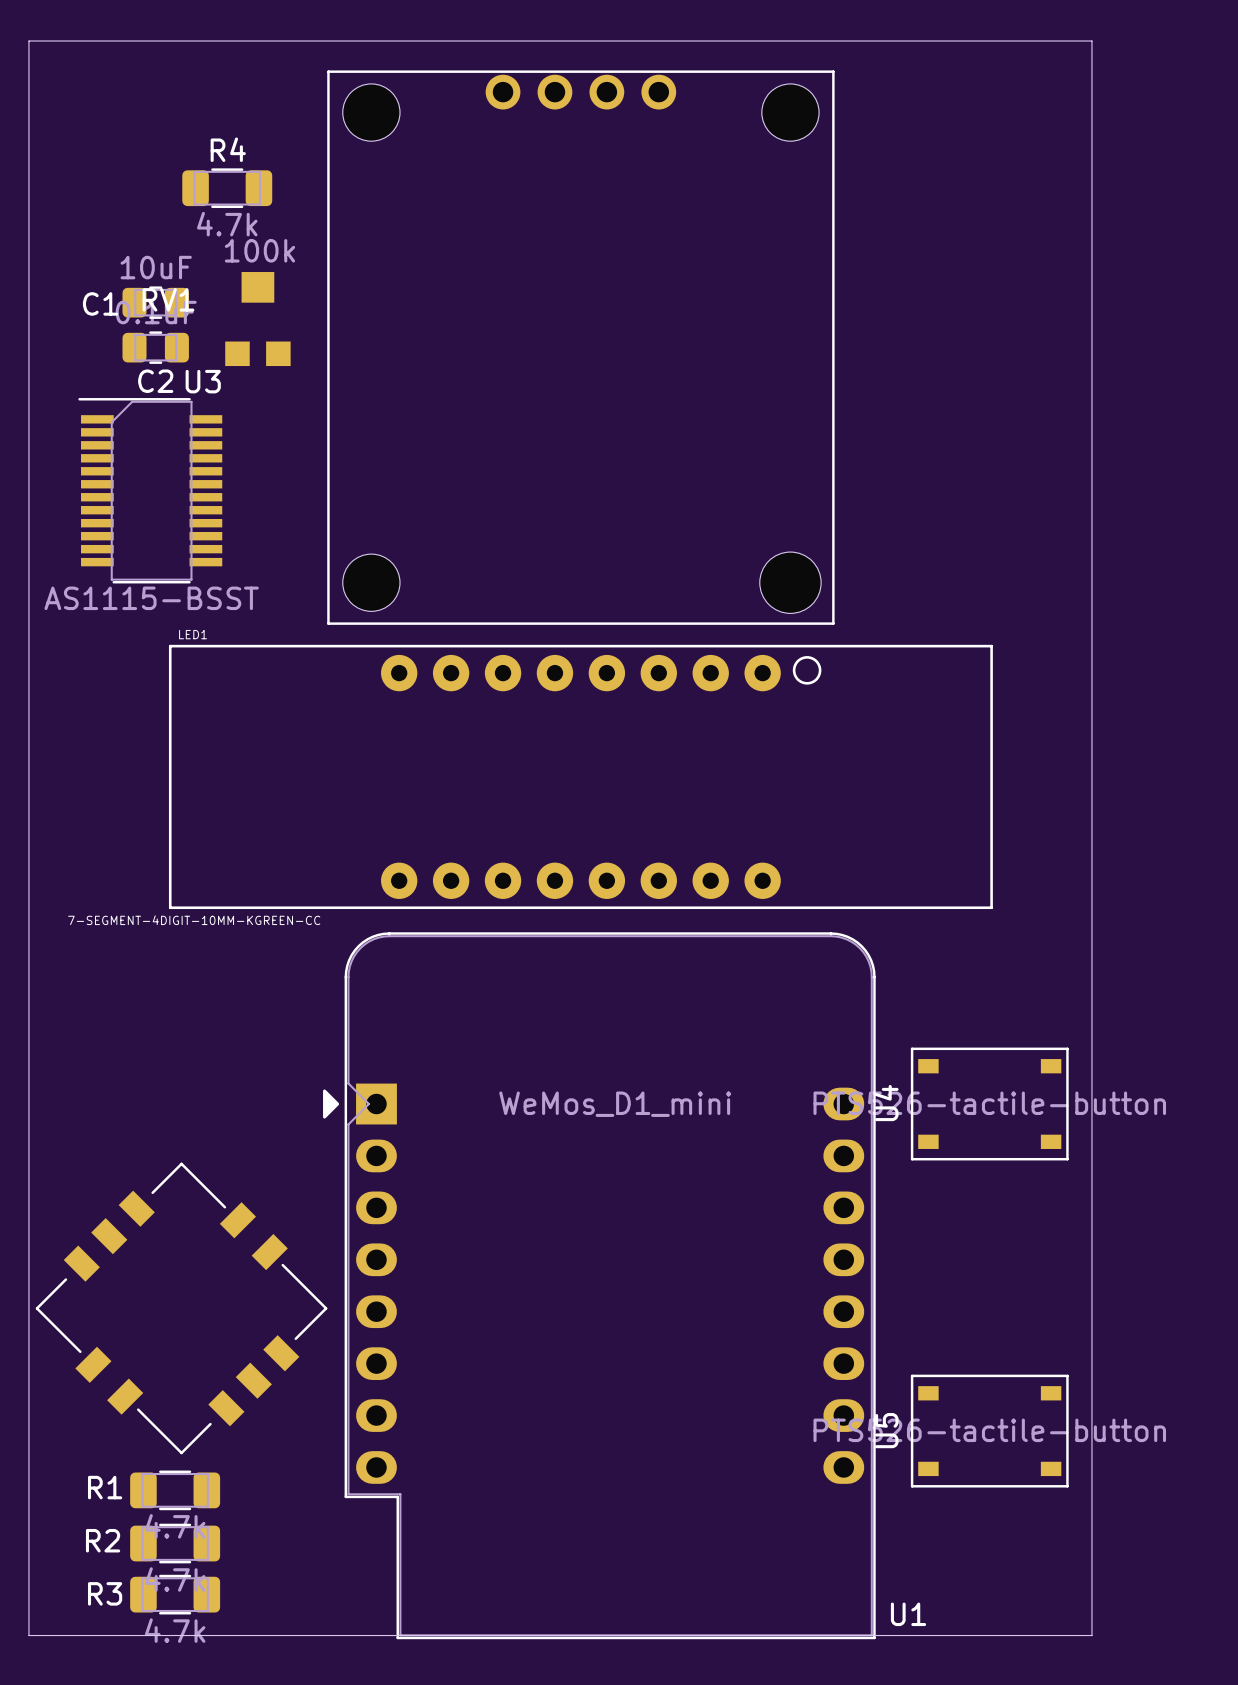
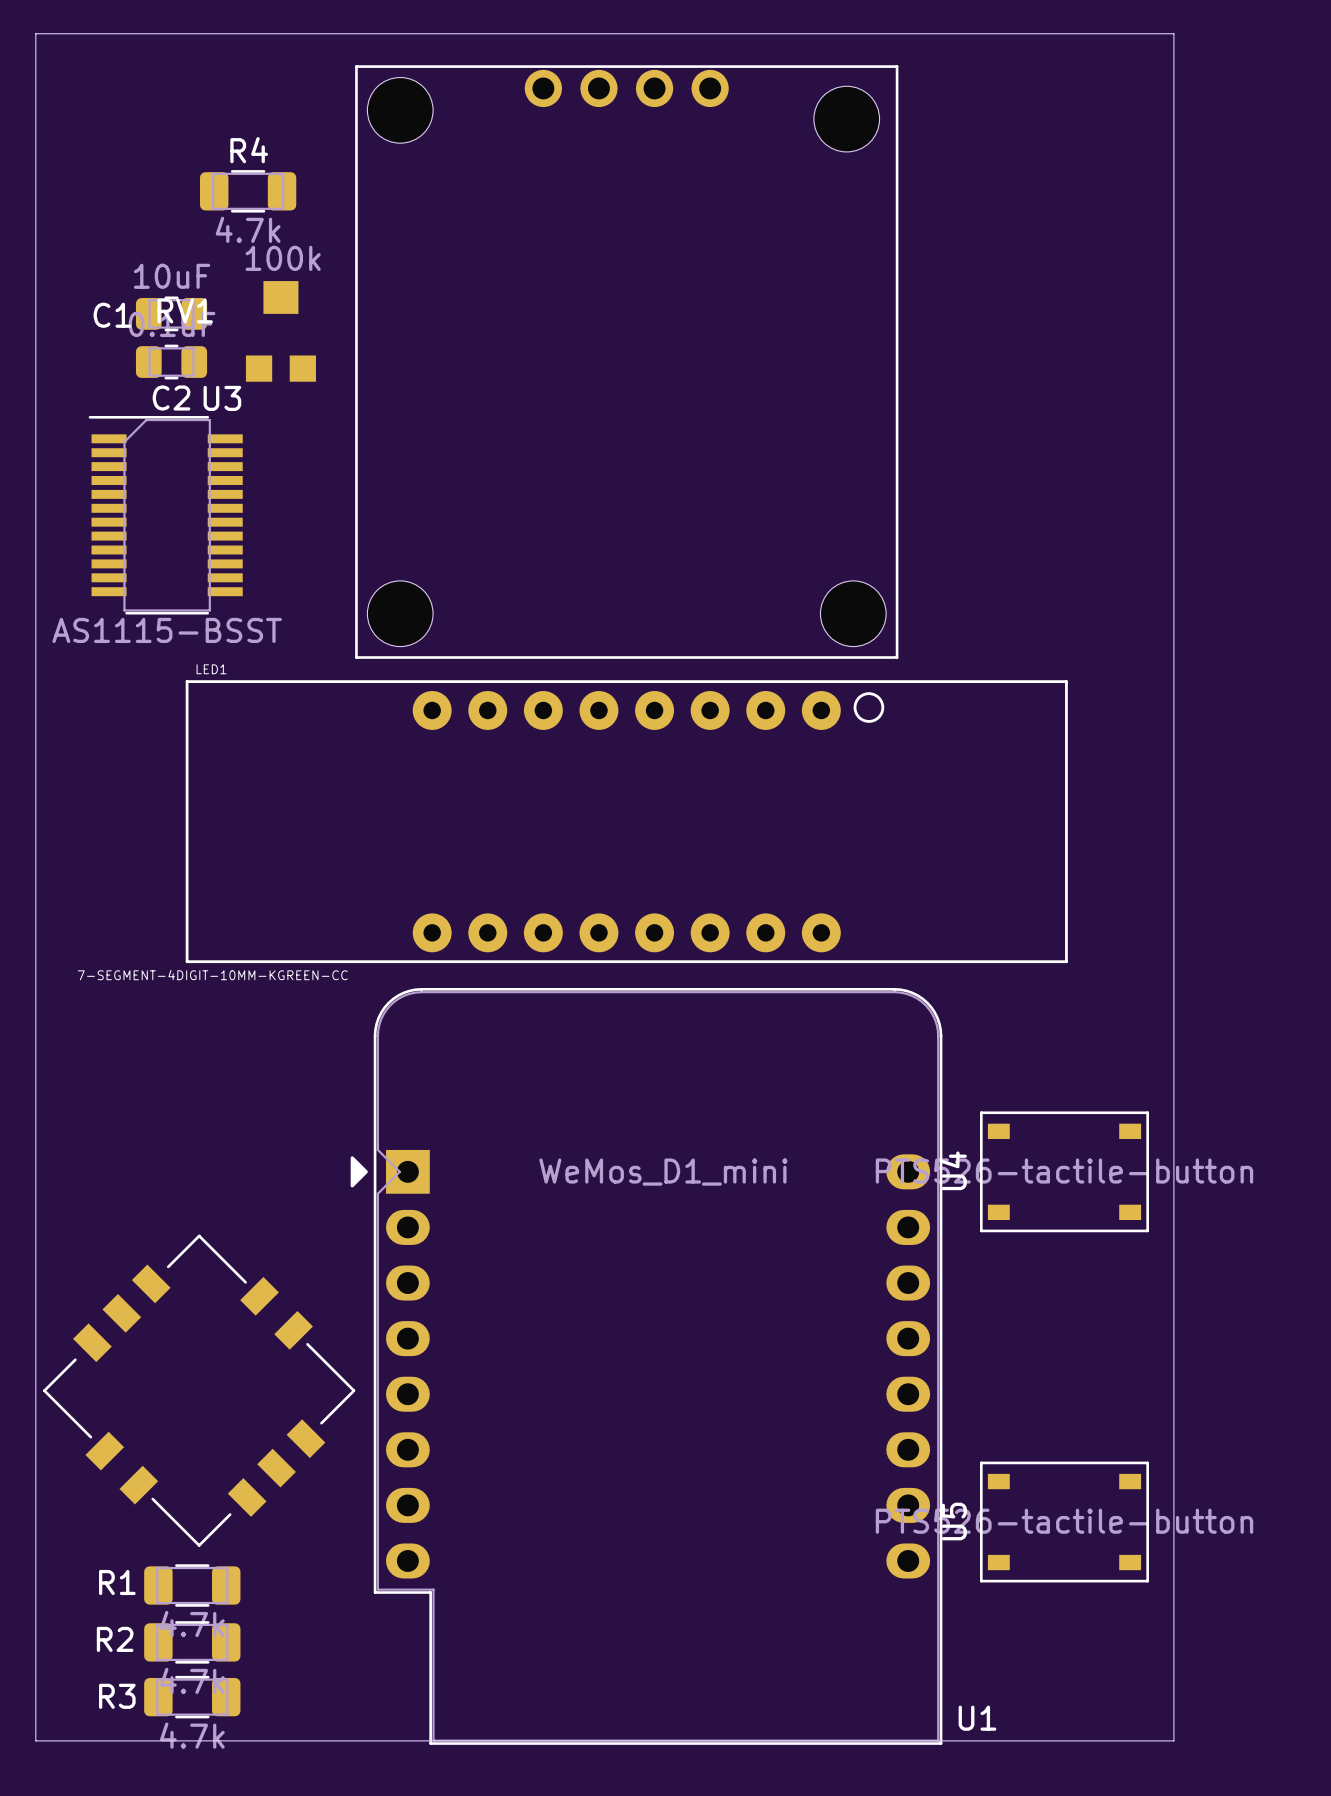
part footprint: [327, 70, 835, 625] -> [355, 65, 899, 659]

